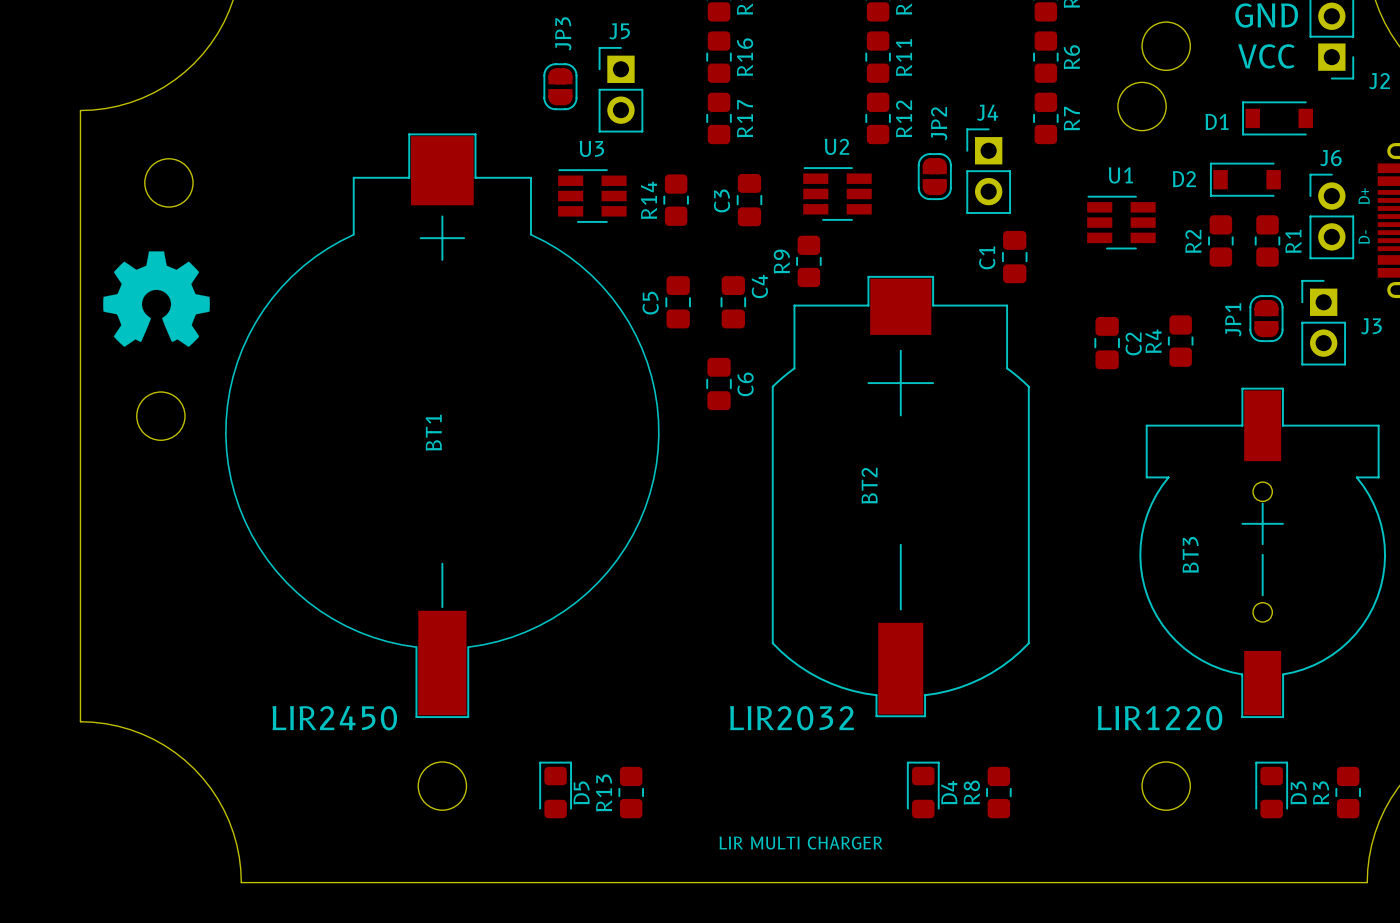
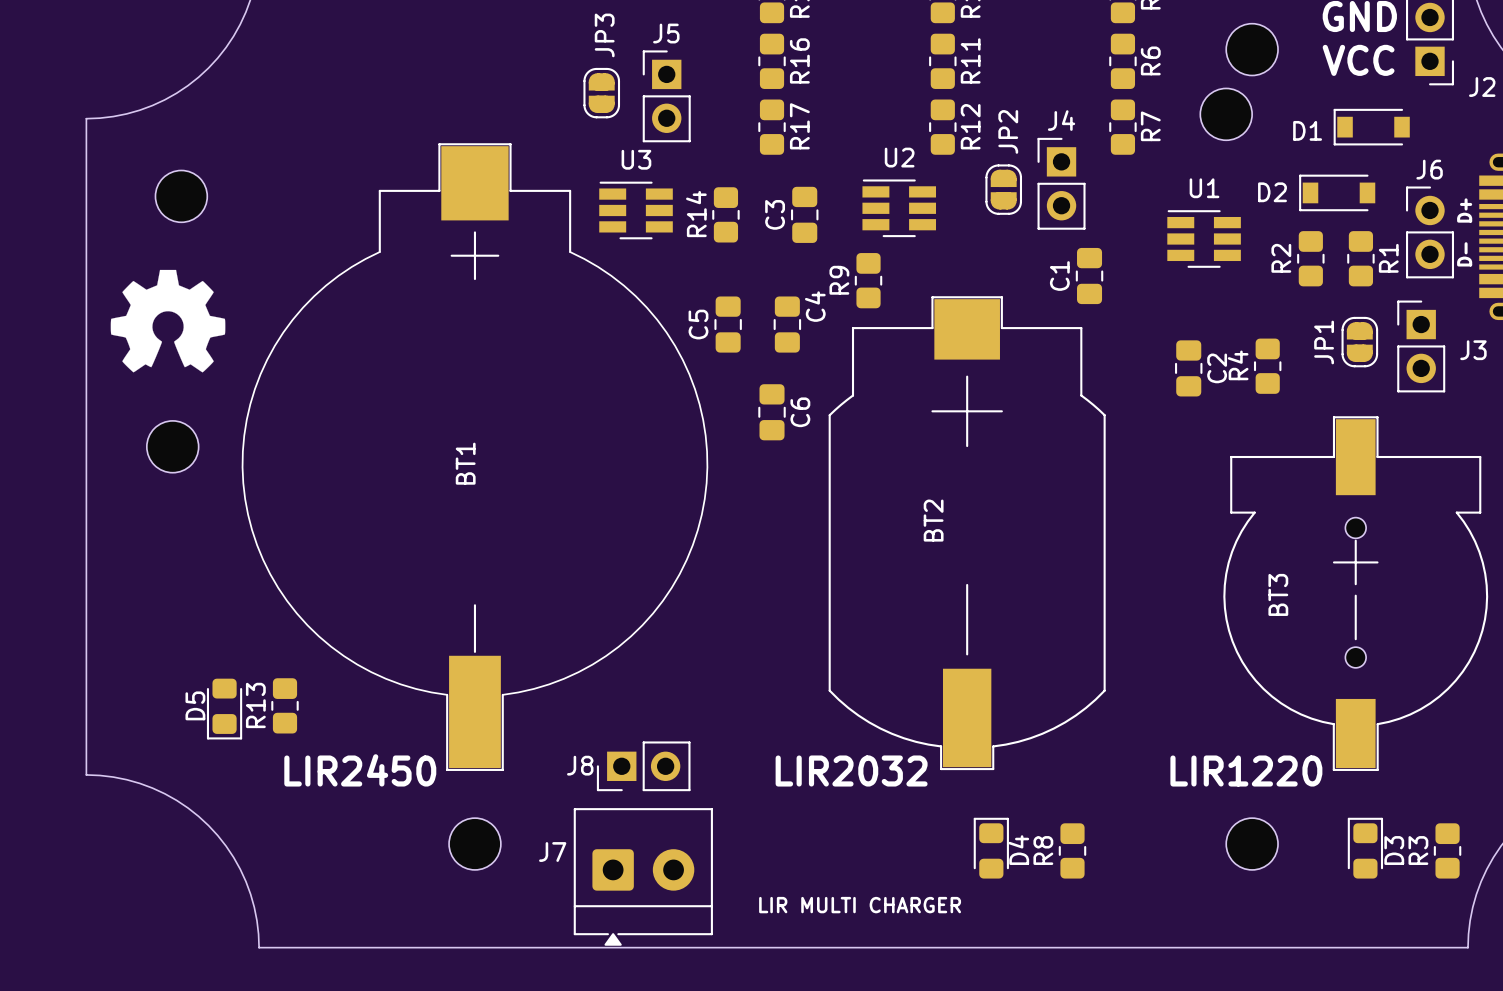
J8: none -> (643, 766)
D5 rotation: 0° (555, 789) -> 180° (224, 709)
D5 position: (555, 789) -> (224, 709)
R13 position: (631, 792) -> (284, 705)
J7: none -> (643, 876)

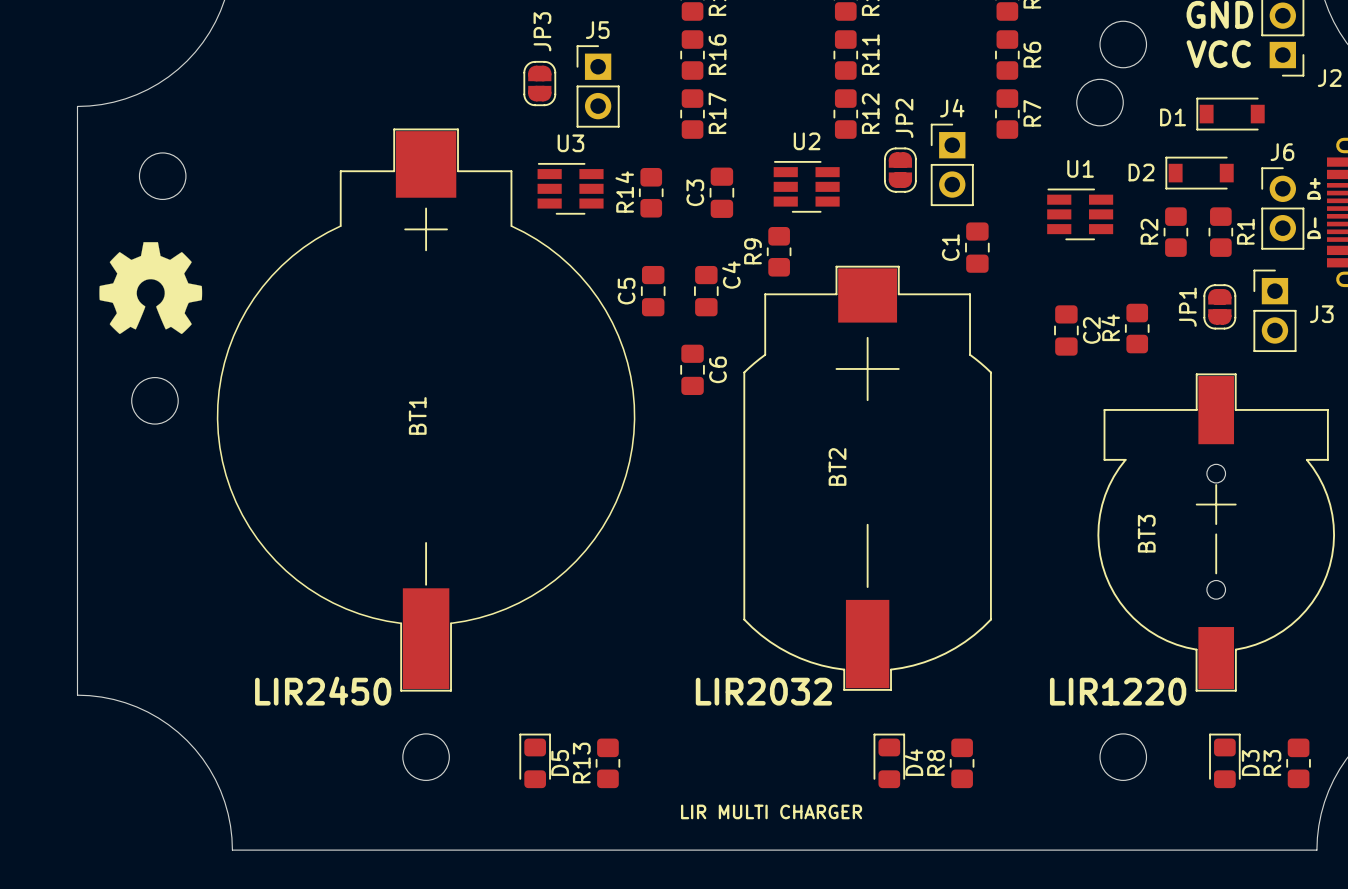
R13 position: (284, 705) -> (607, 763)
D5 rotation: 0° (224, 709) -> 180° (535, 760)
D5 position: (224, 709) -> (535, 760)
J8: (643, 766) -> none
J7: (643, 876) -> none

